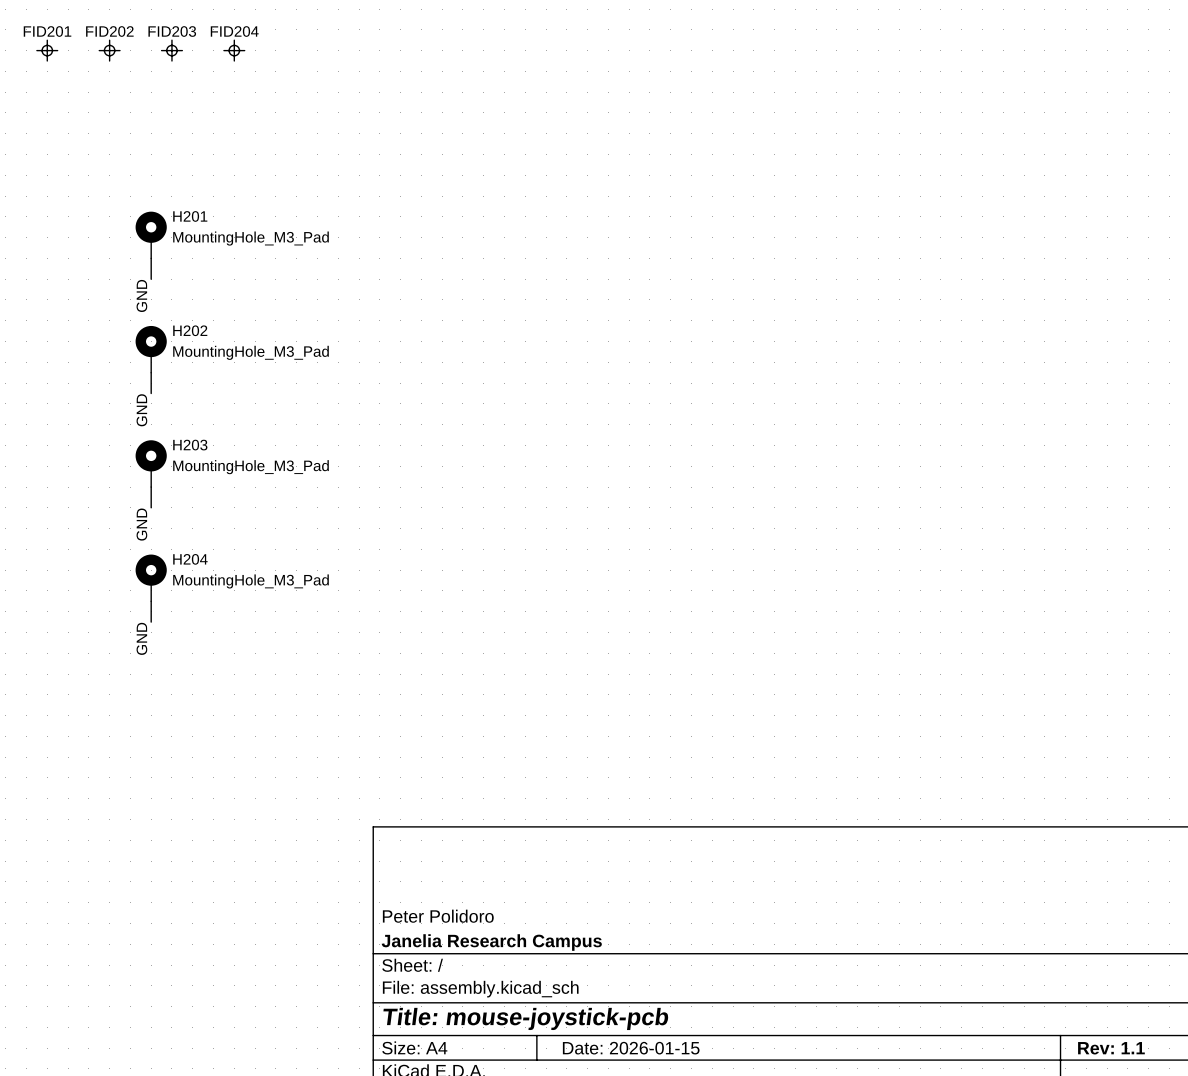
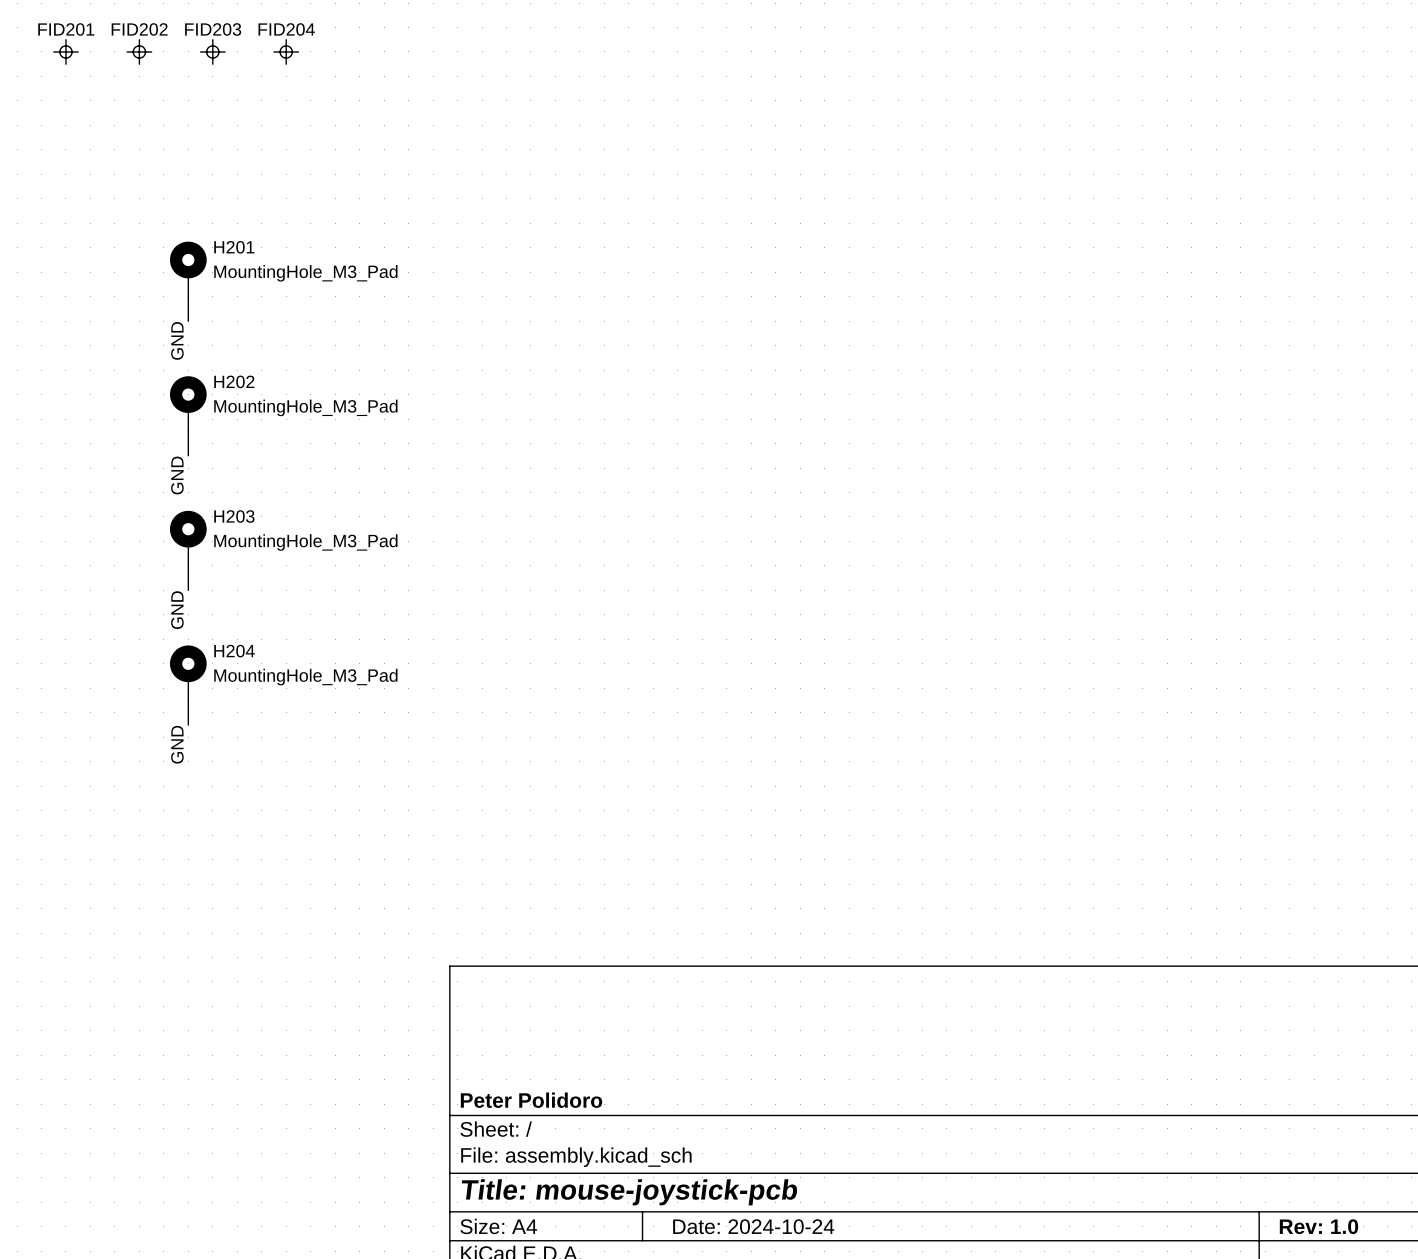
title block: Peter Polidoro (438, 916) -> none
title block: Janelia Research Campus (491, 942) -> Peter Polidoro (531, 1100)
title block: Date: 2026-01-15 (631, 1048) -> Date: 2024-10-24 (753, 1226)
title block: Rev: 1.1 (1111, 1048) -> Rev: 1.0 (1318, 1226)

